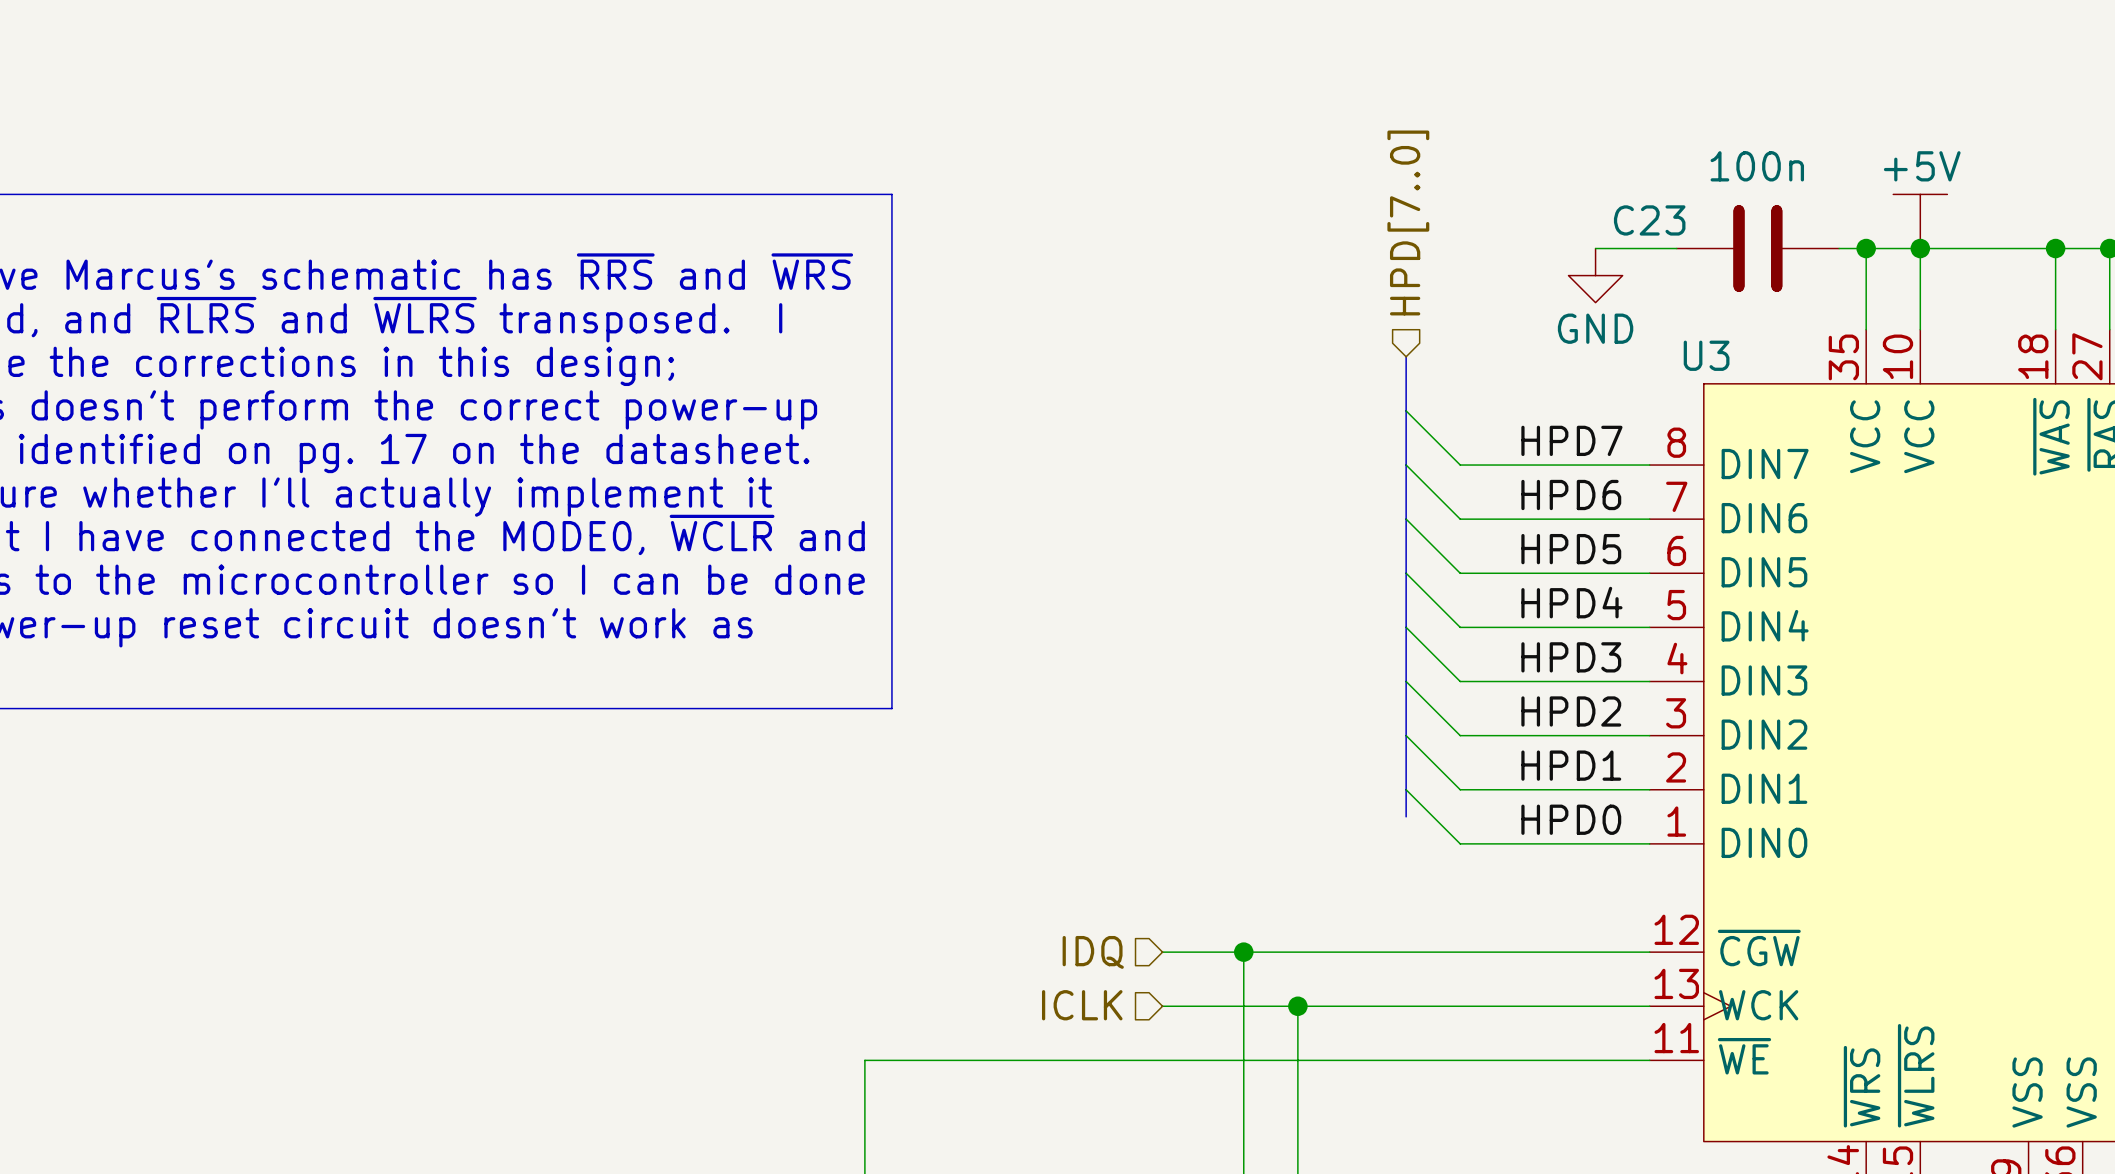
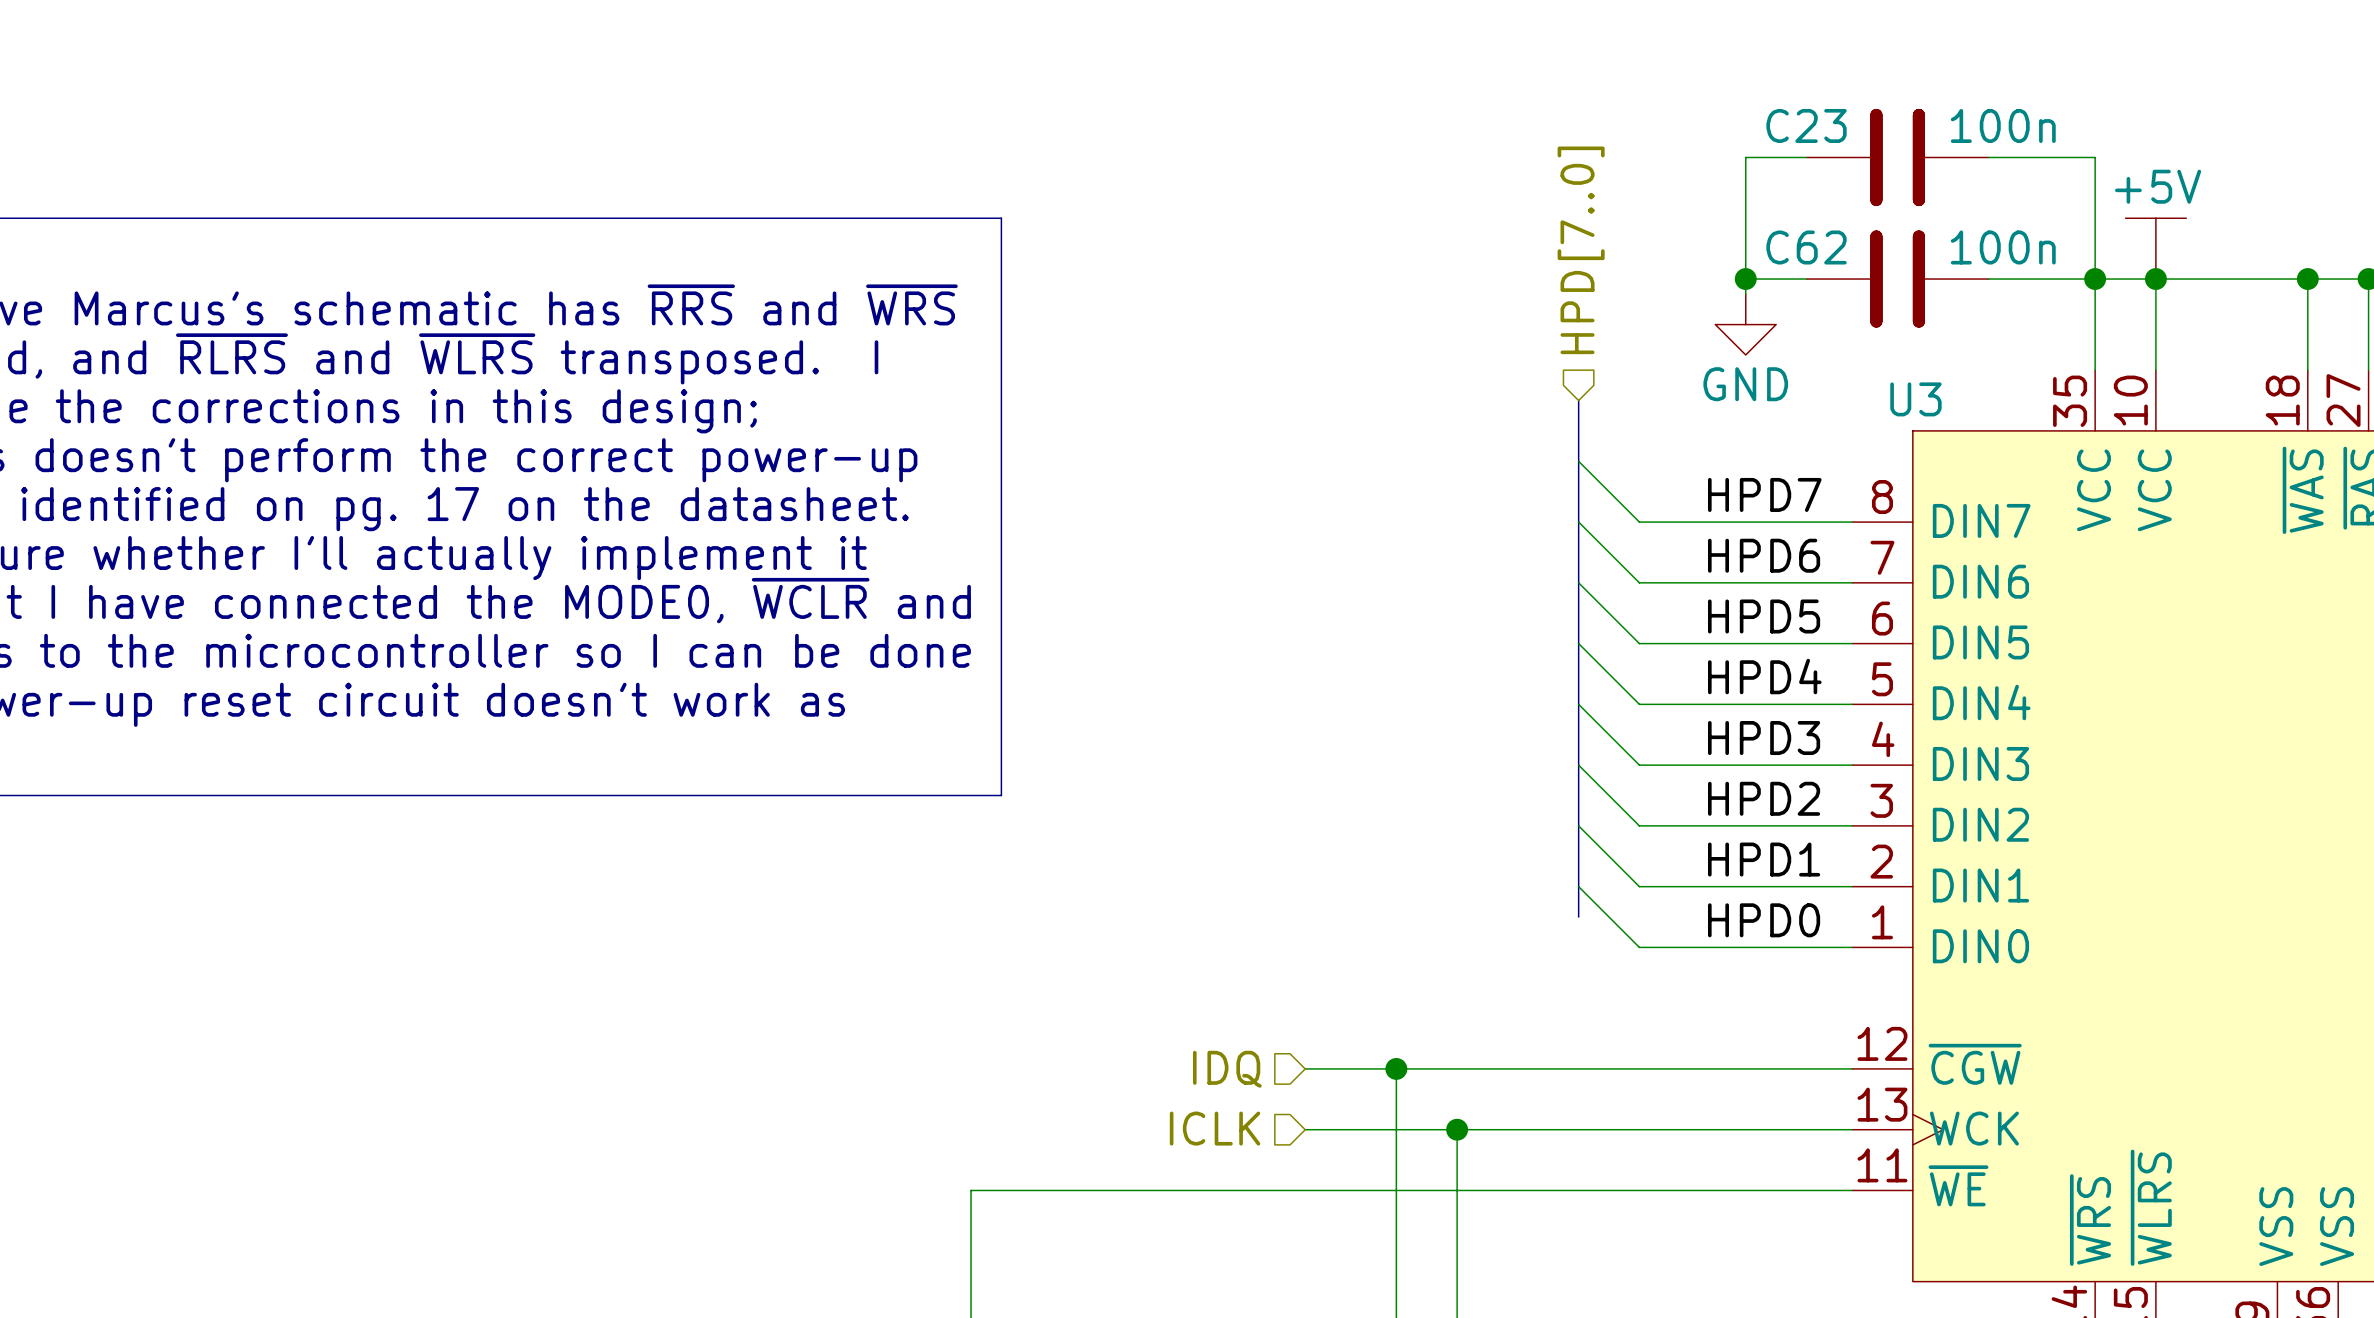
wire: none -> (1806, 157) (1745, 157) (1745, 294)
wire: none -> (1988, 157) (2095, 157) (2095, 279)
C23 value position: 100n (1757, 166) -> 100n (2003, 125)
C23 name position: C23 (1649, 220) -> C23 (1806, 125)
wire: none -> (1745, 279) (1791, 279)
junction: none -> (1745, 279)
C62: none -> 100n (1897, 279)
C23 position: (1757, 248) -> (1897, 157)
power symbol position: GND (1595, 275) -> GND (1745, 324)

